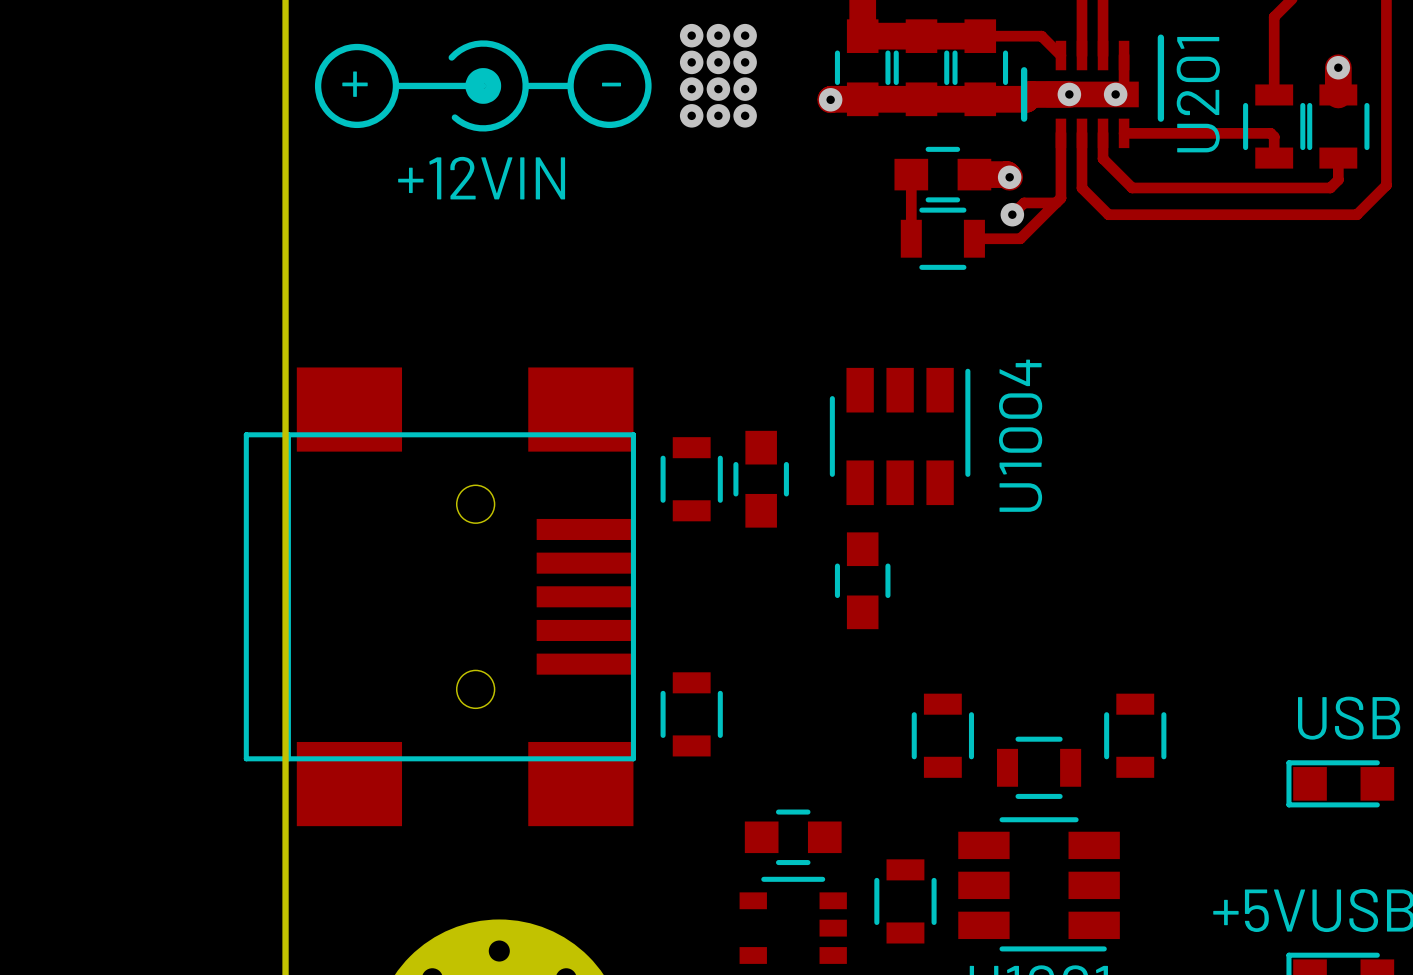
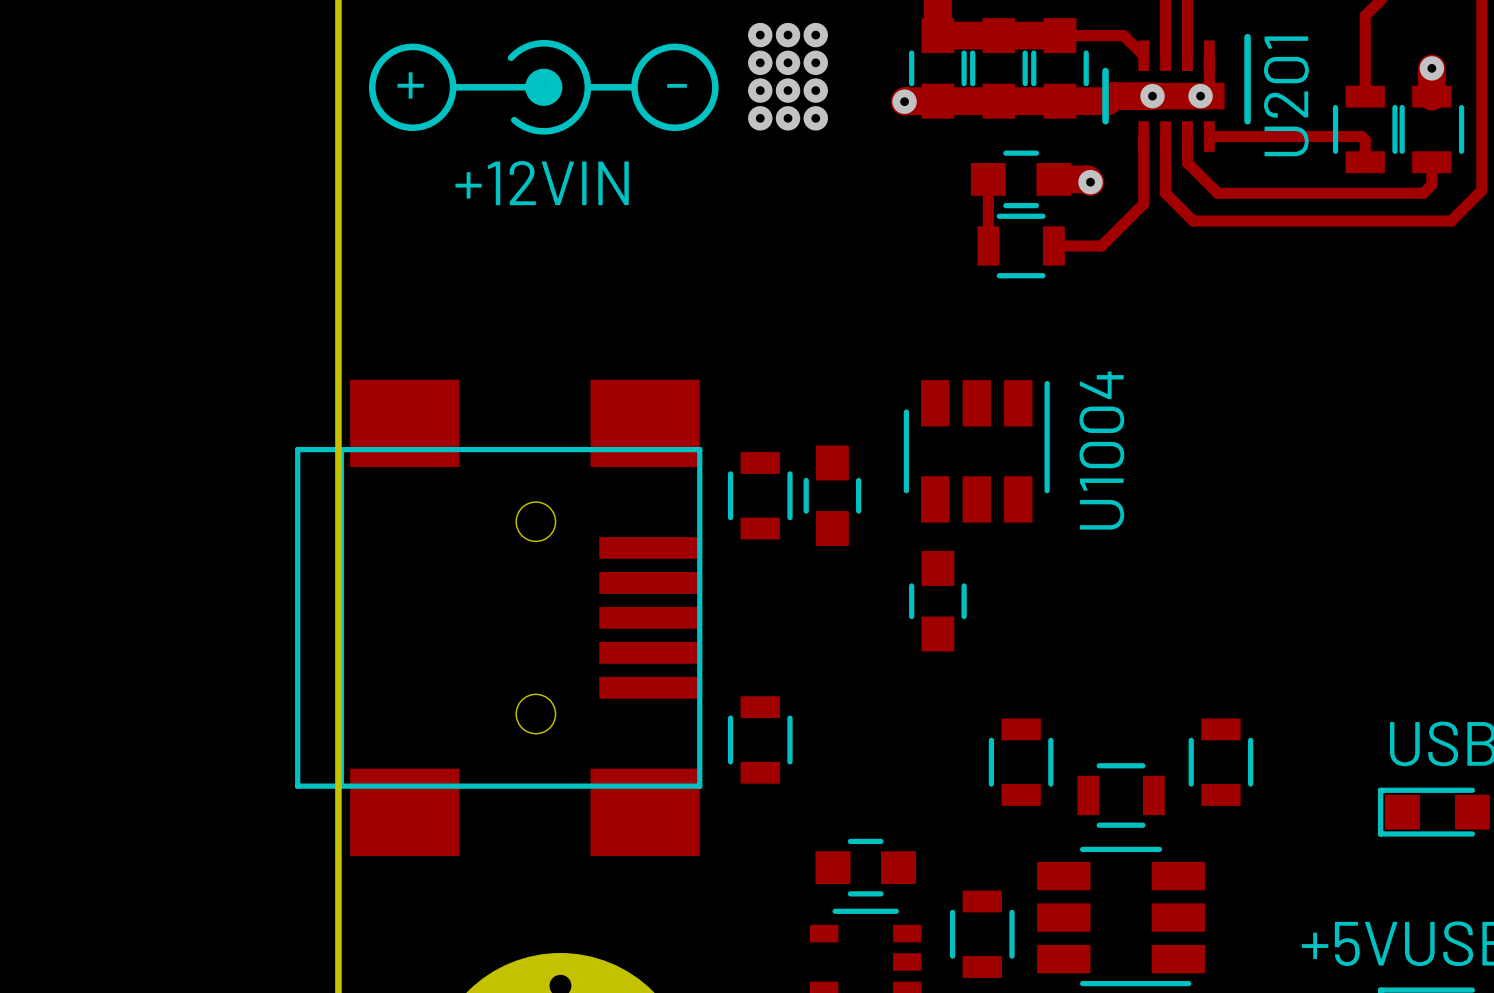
track: (1056, 202) (1024, 202) (1012, 214) -> none
via: (1012, 214) -> none

